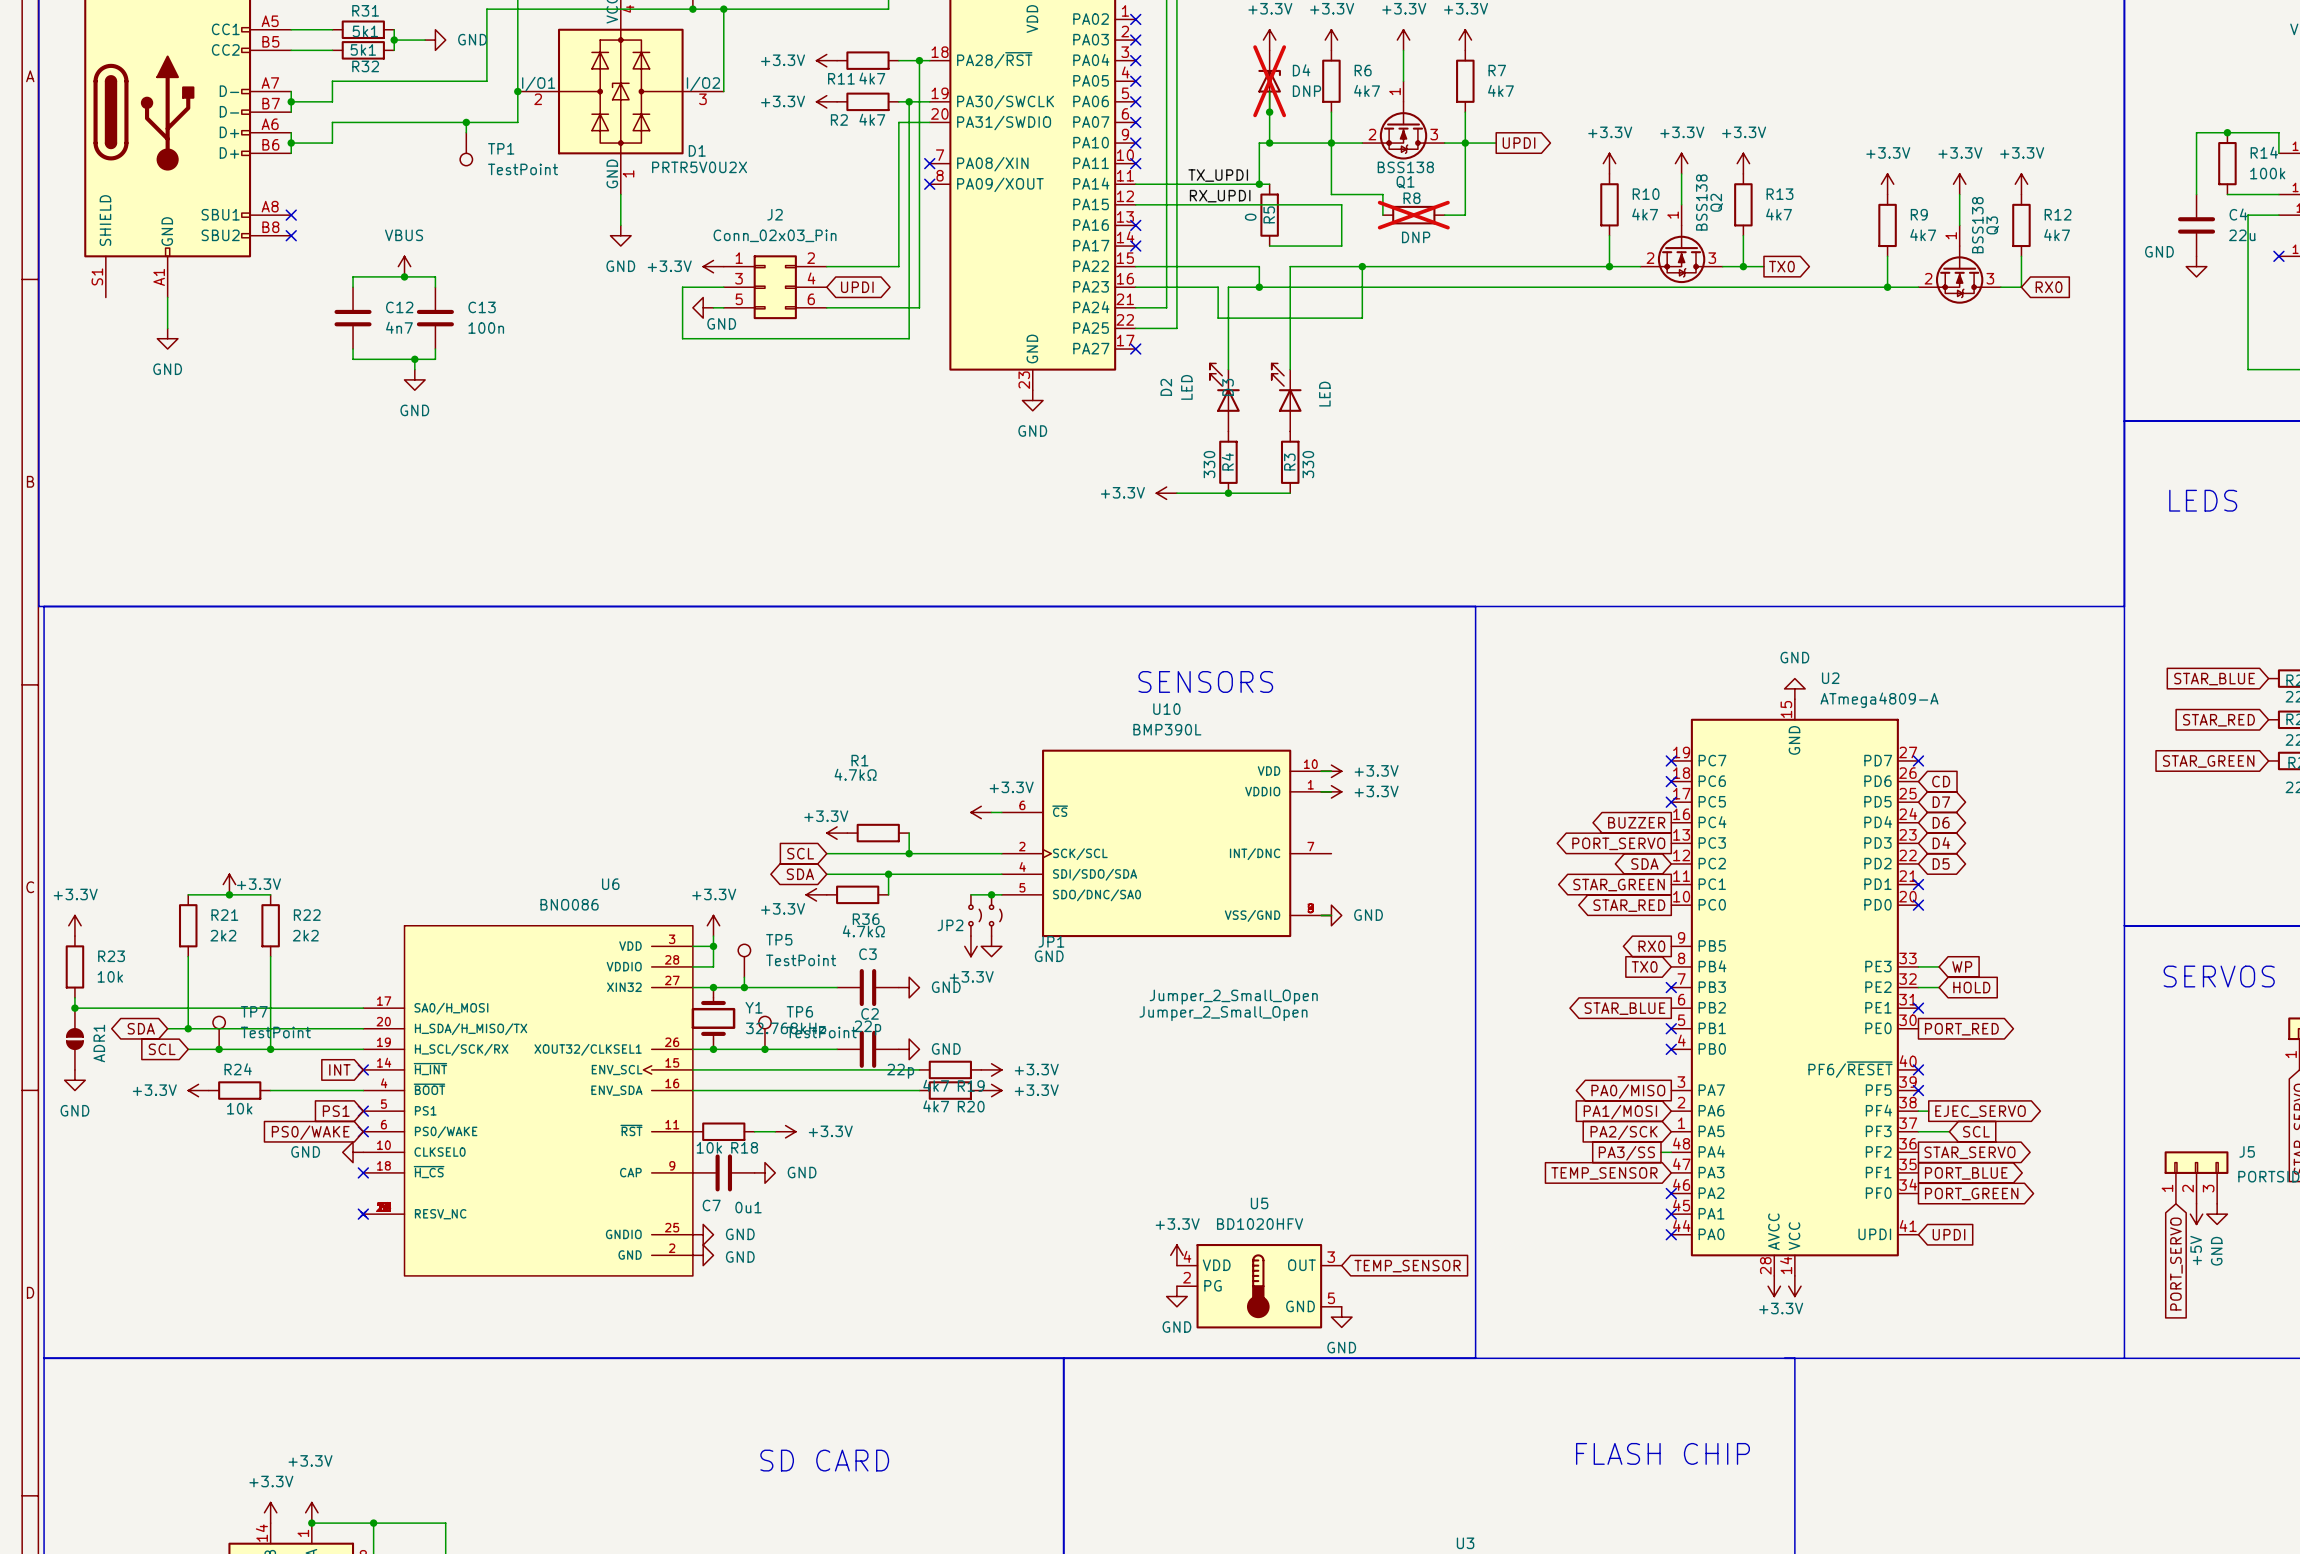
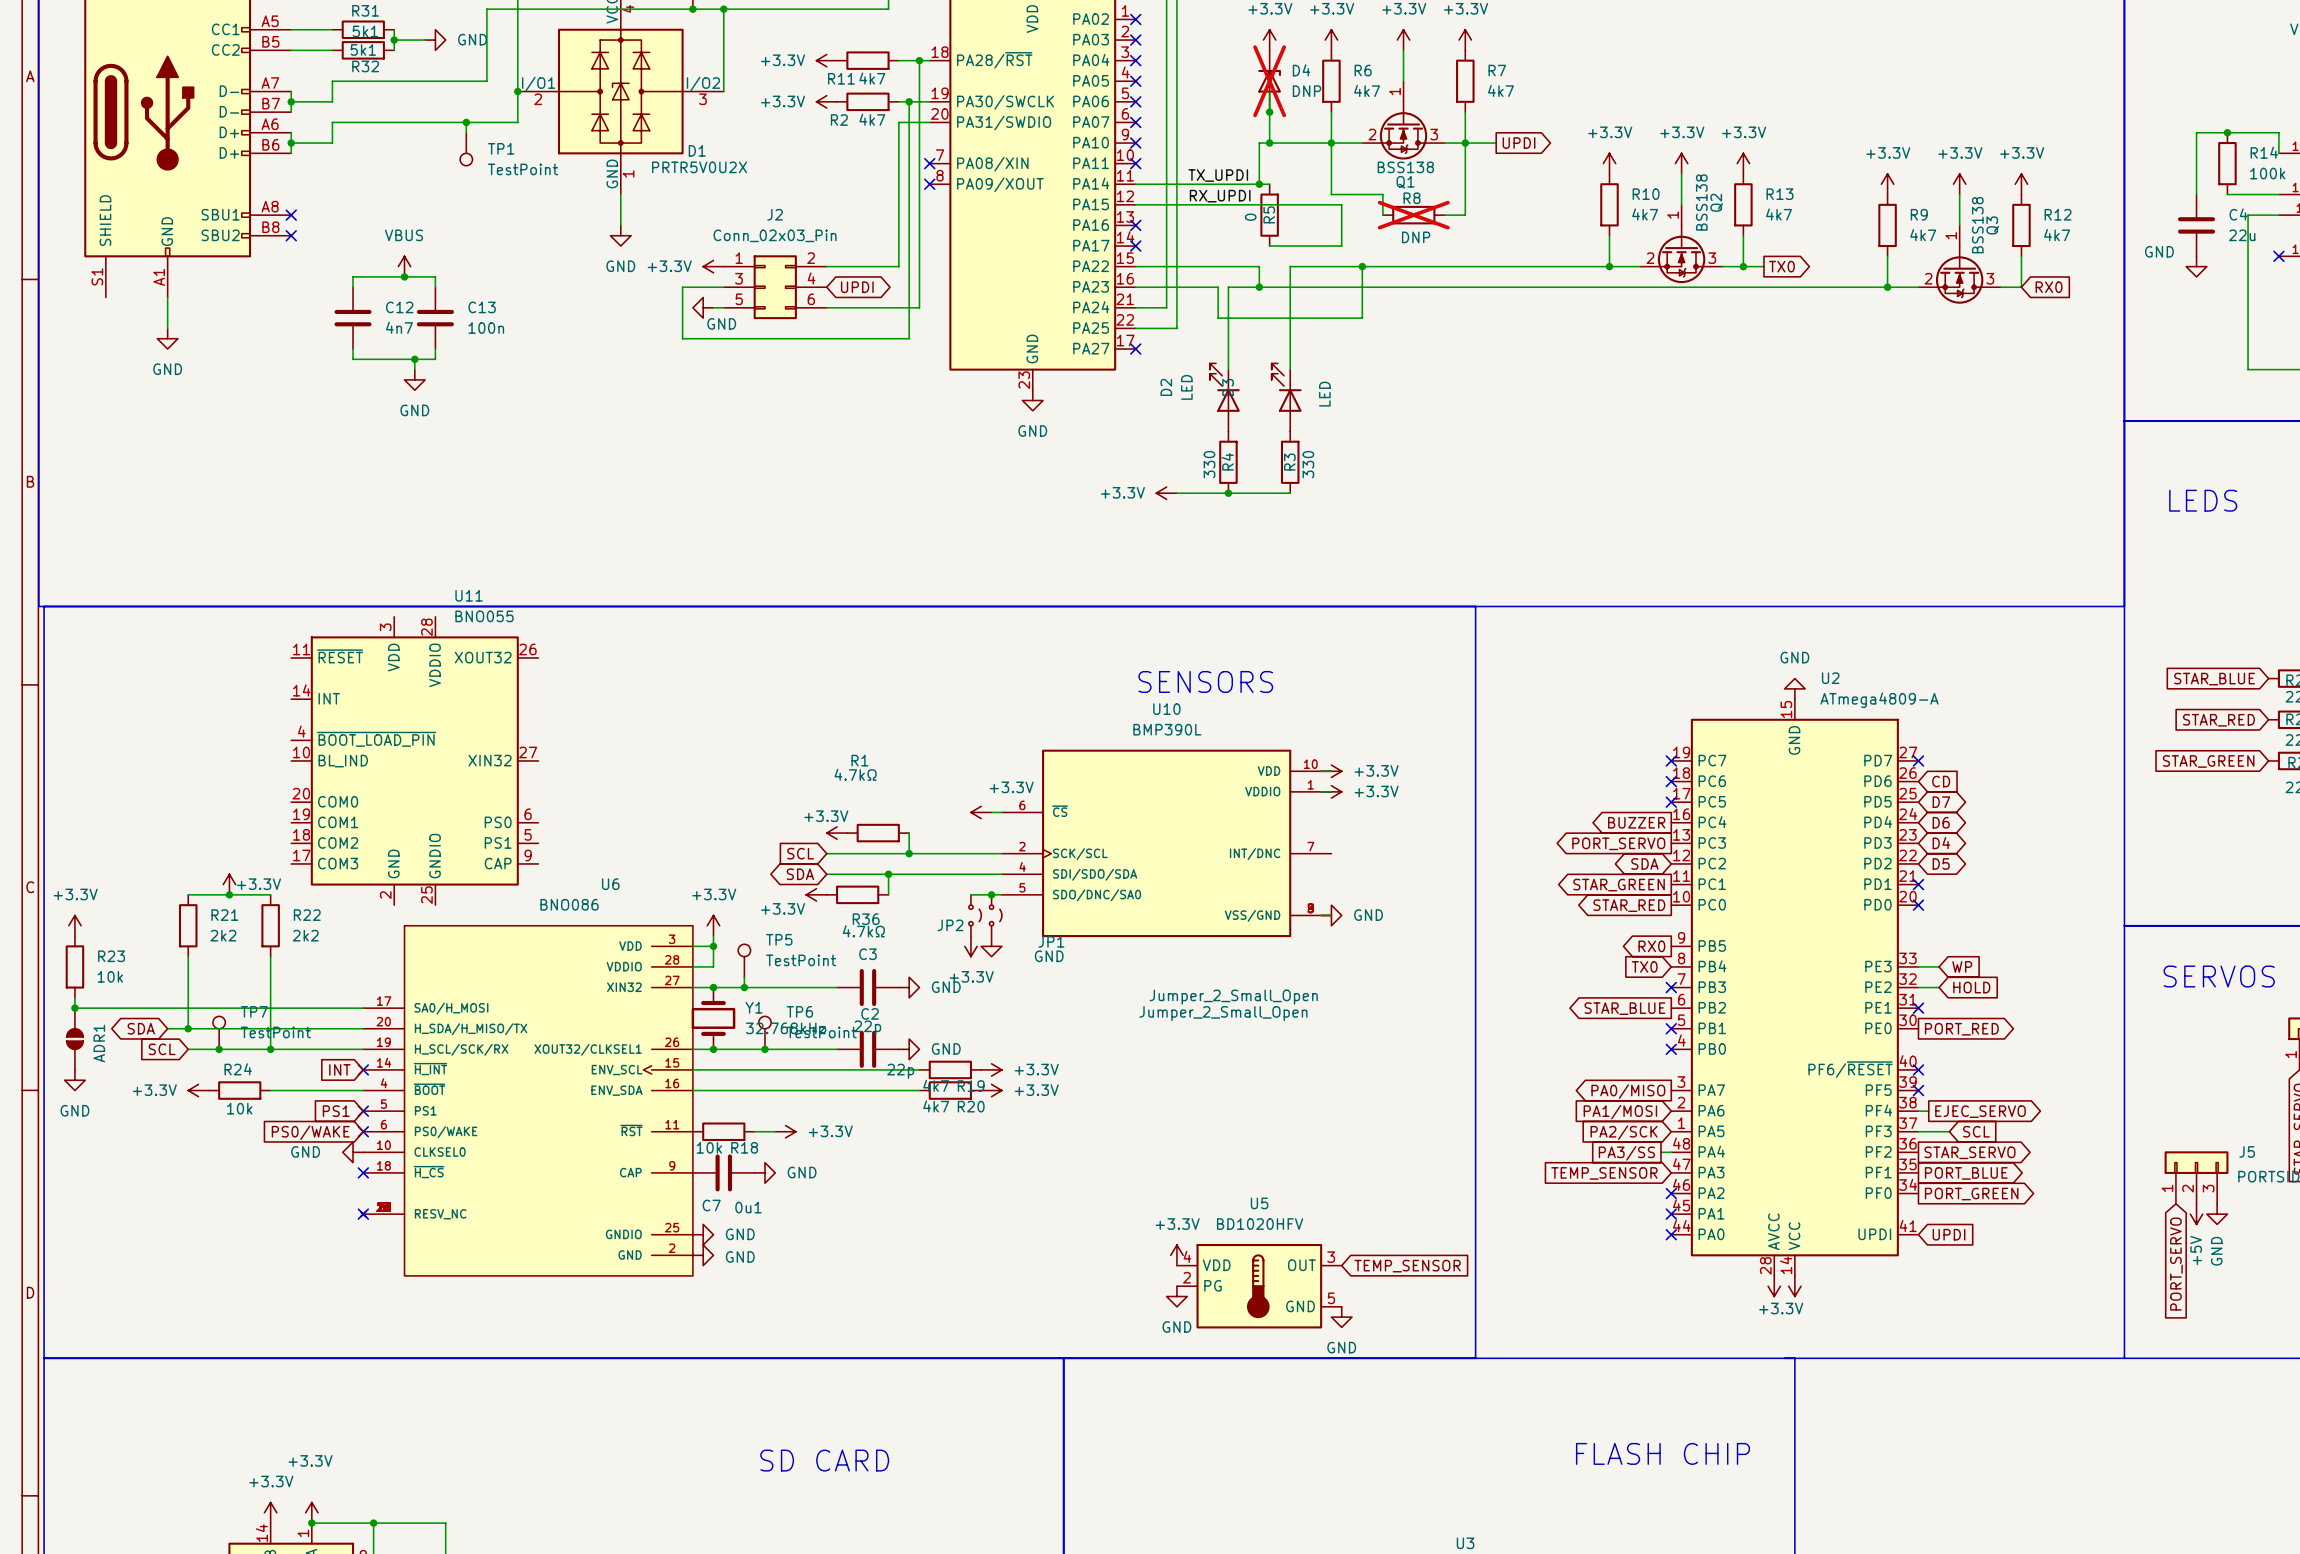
U11: none -> BNO055 (414, 760)

